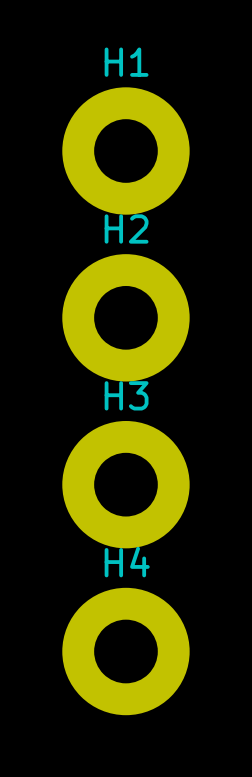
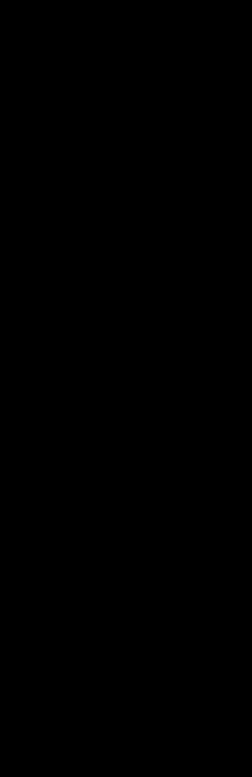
H1: (125, 150) -> none
H2: (125, 317) -> none
H3: (125, 484) -> none
H4: (125, 651) -> none

